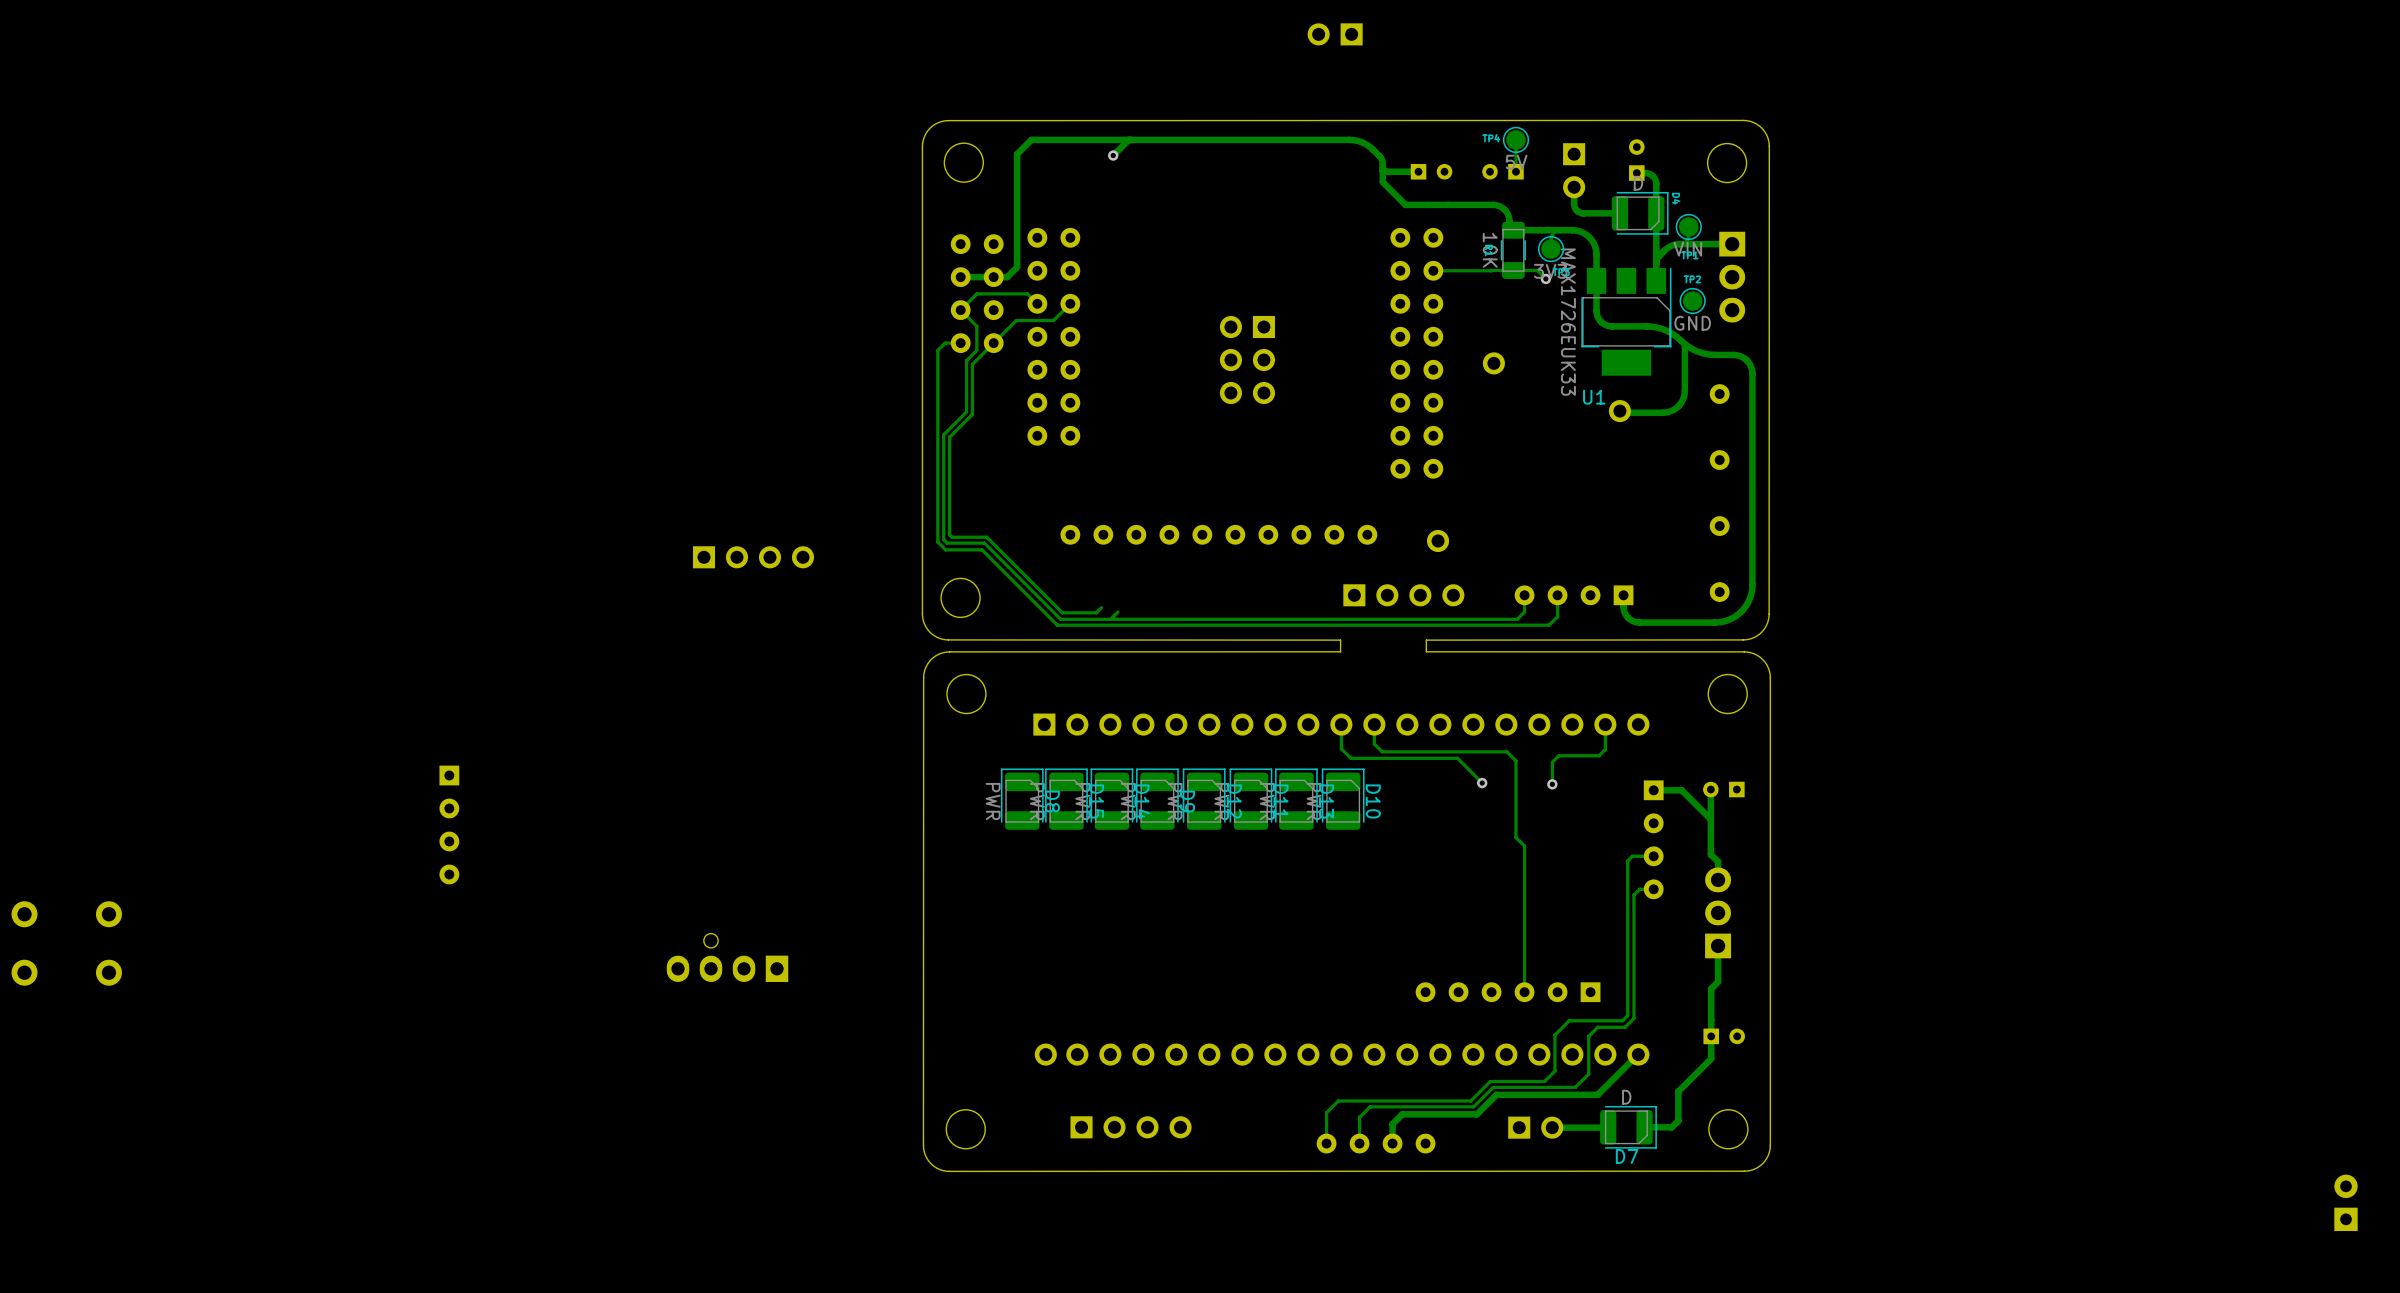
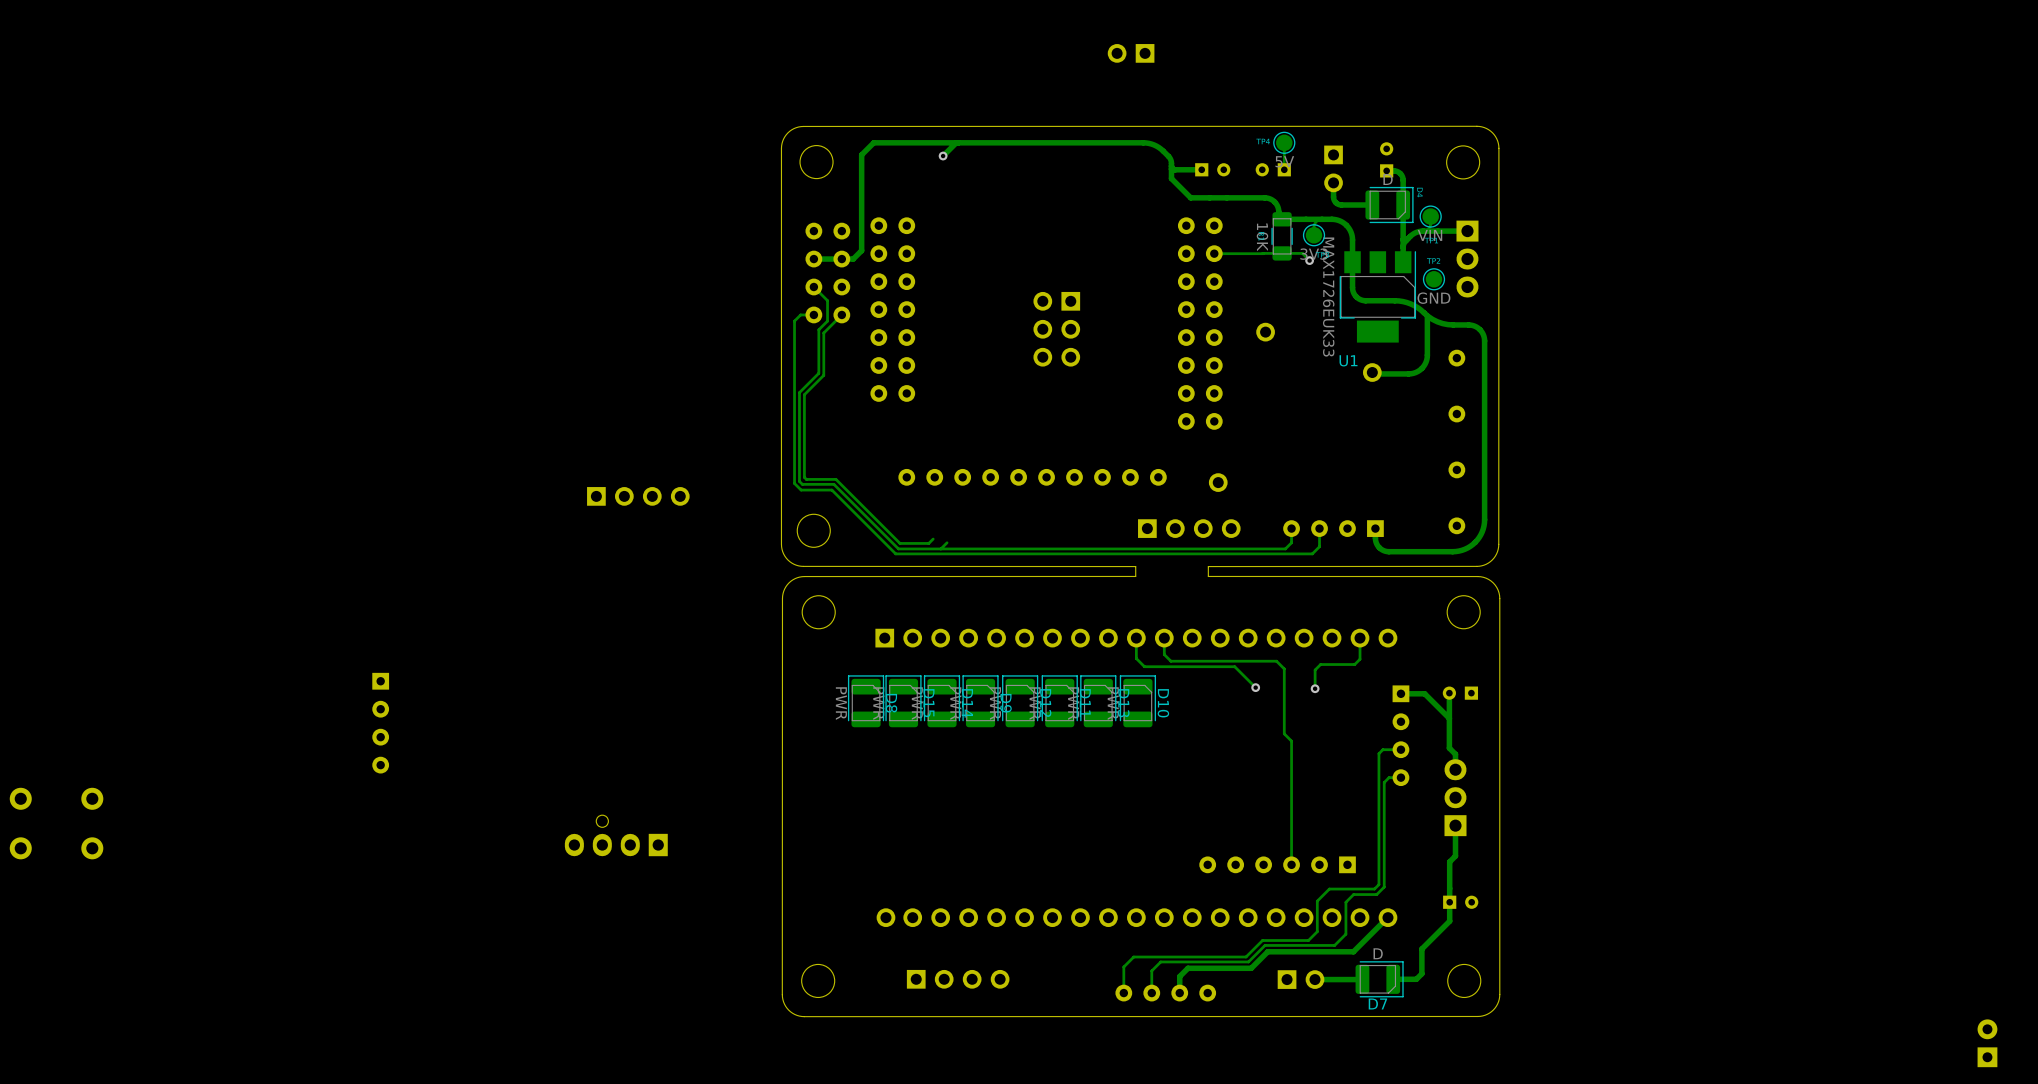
track: (1037, 303) (1027, 293) (976, 293) (960, 310) -> none
track: (1070, 303) (1053, 320) (1016, 320) (993, 343) -> none

